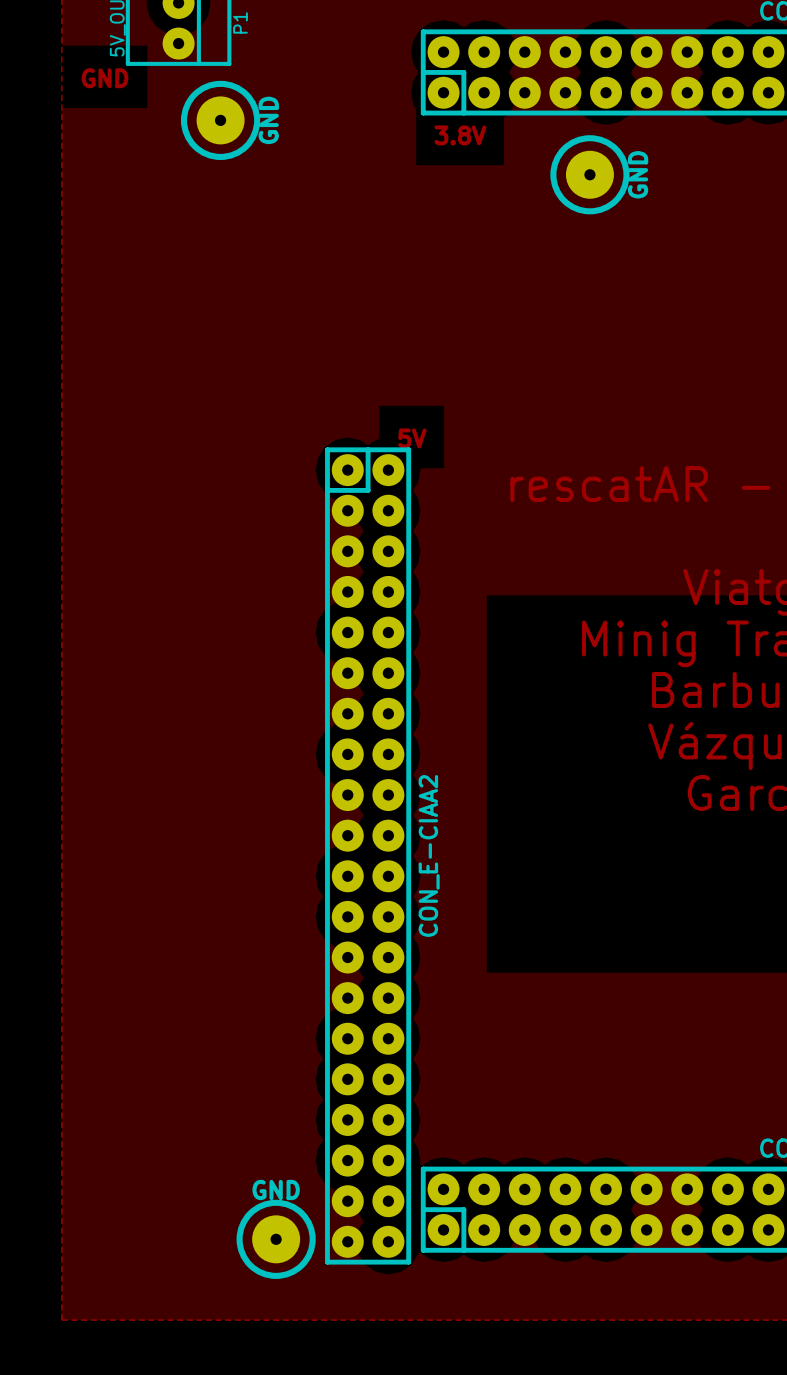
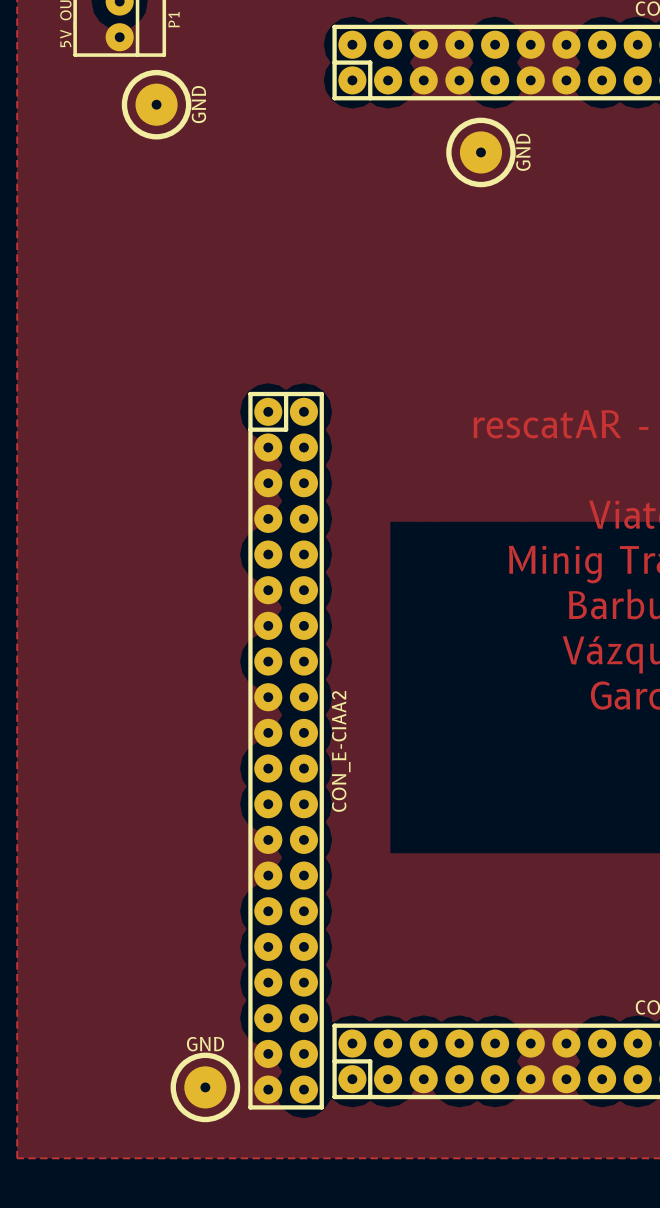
text: GND (105, 78) -> none
text: 3.8V (460, 135) -> none
text: 5V (412, 438) -> none

